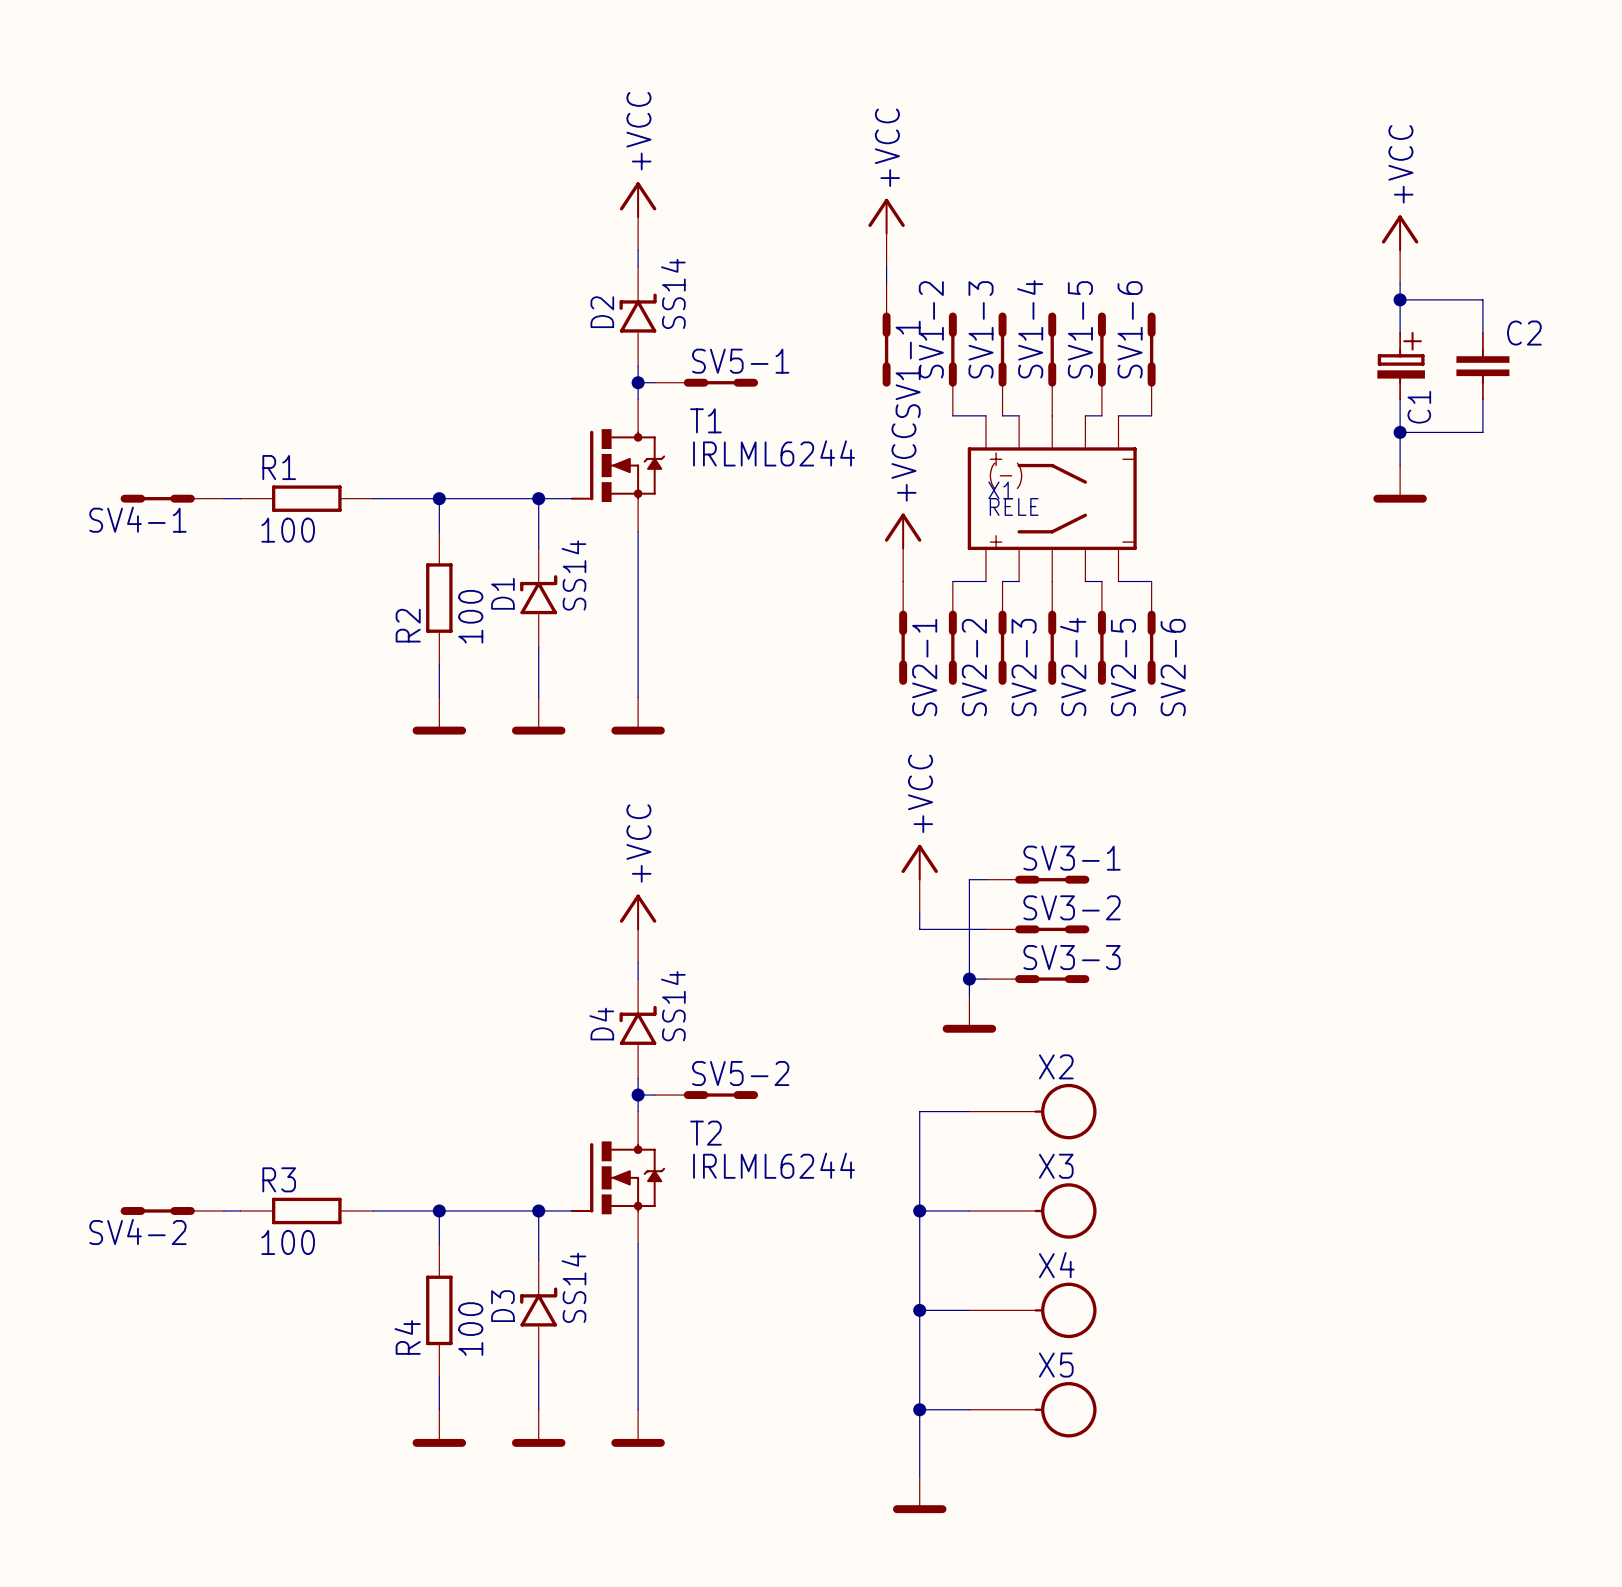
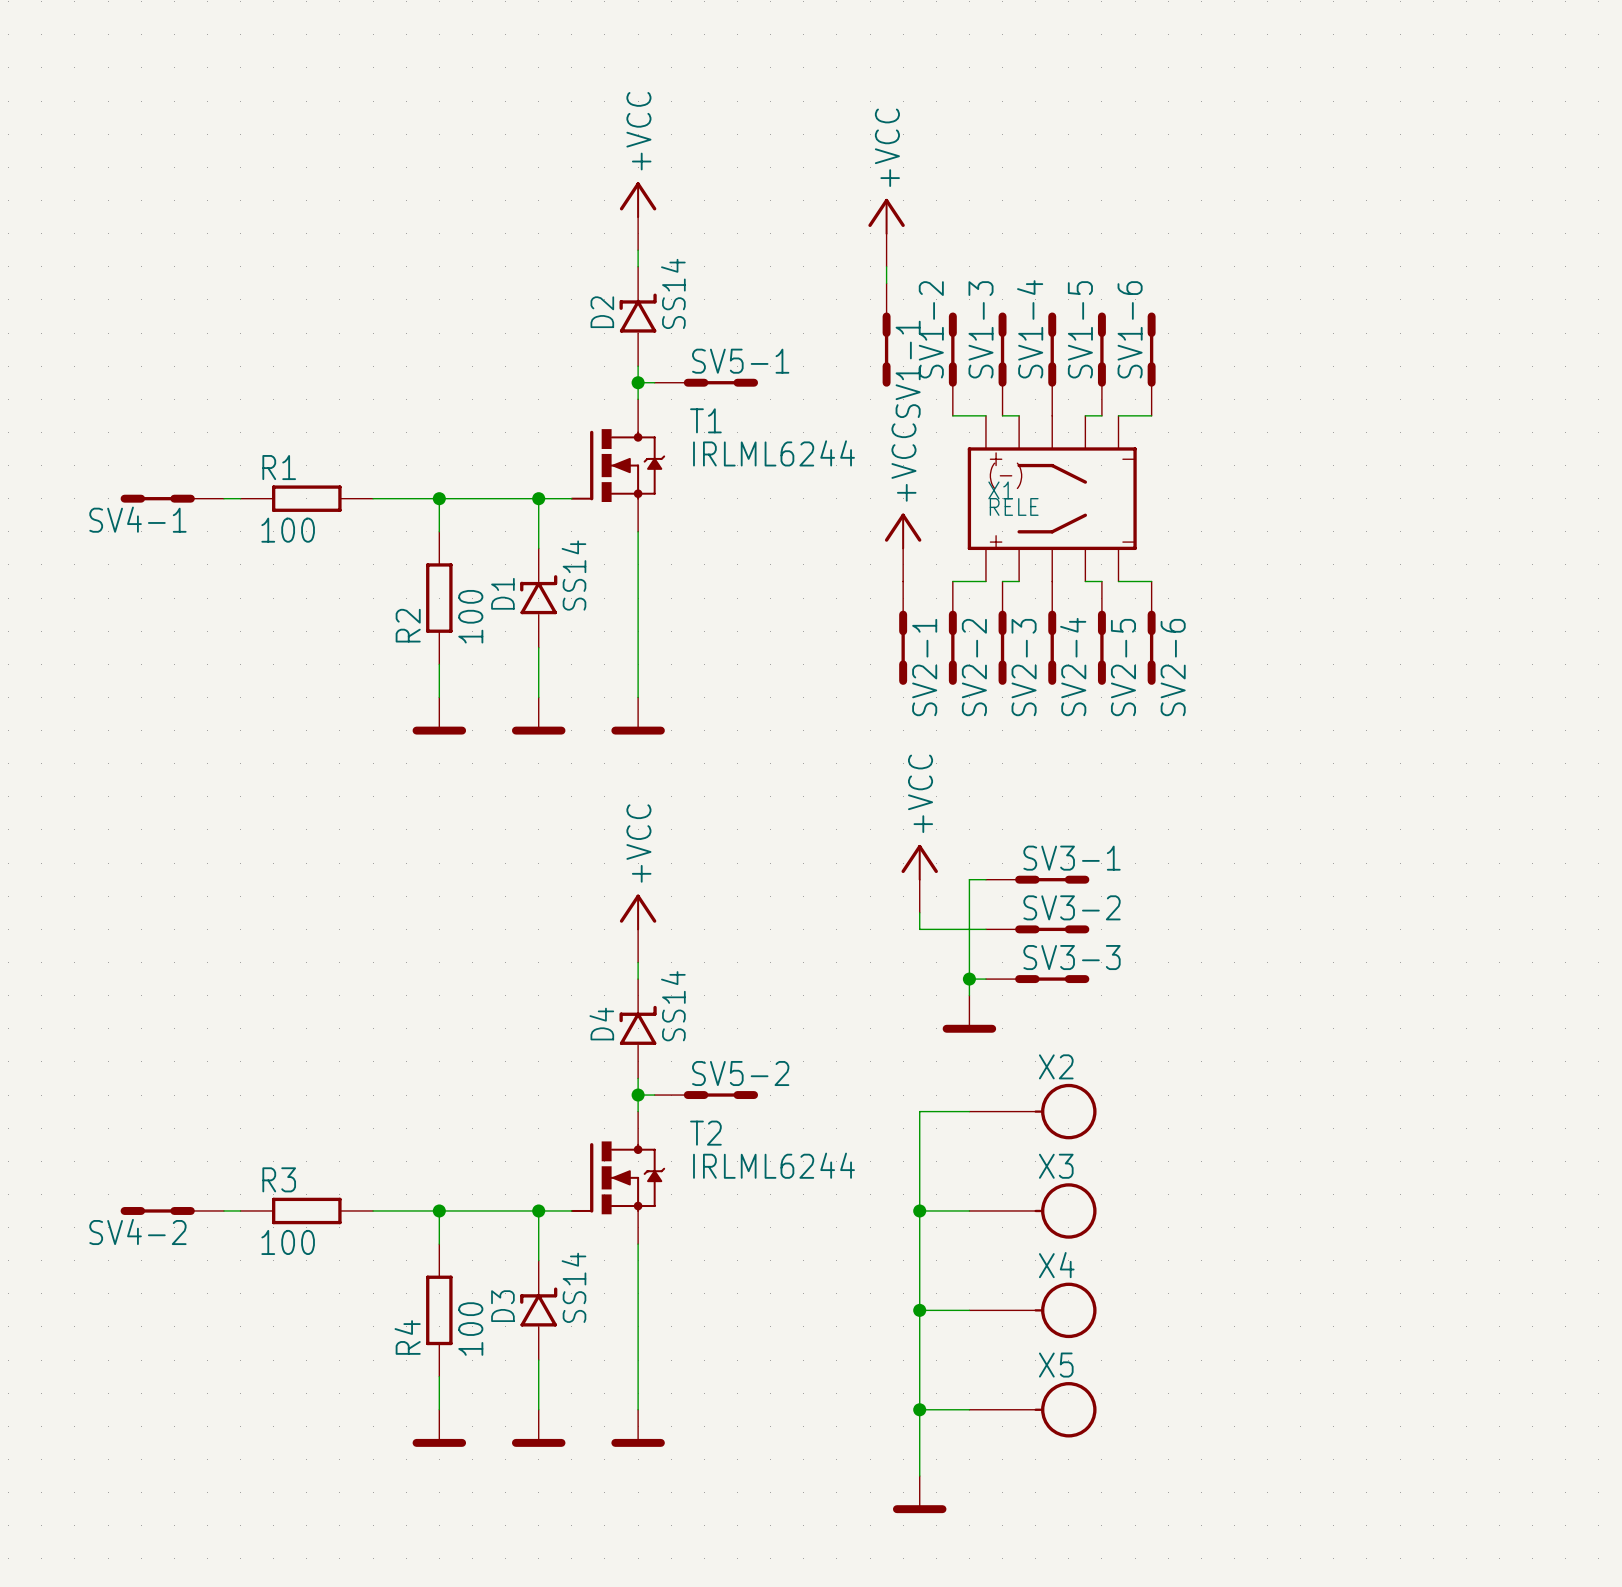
power symbol: +VCC (1400, 249) -> none
wire: (1400, 283) (1400, 333) -> none
wire: (1400, 299) (1482, 299) (1482, 333) -> none
junction: (1400, 299) -> none
C1: (1401, 366) -> none
C2: (1482, 366) -> none
wire: (1400, 399) (1400, 465) -> none
wire: (1482, 399) (1482, 432) (1400, 432) -> none
junction: (1400, 432) -> none
power symbol: (1400, 484) -> none

